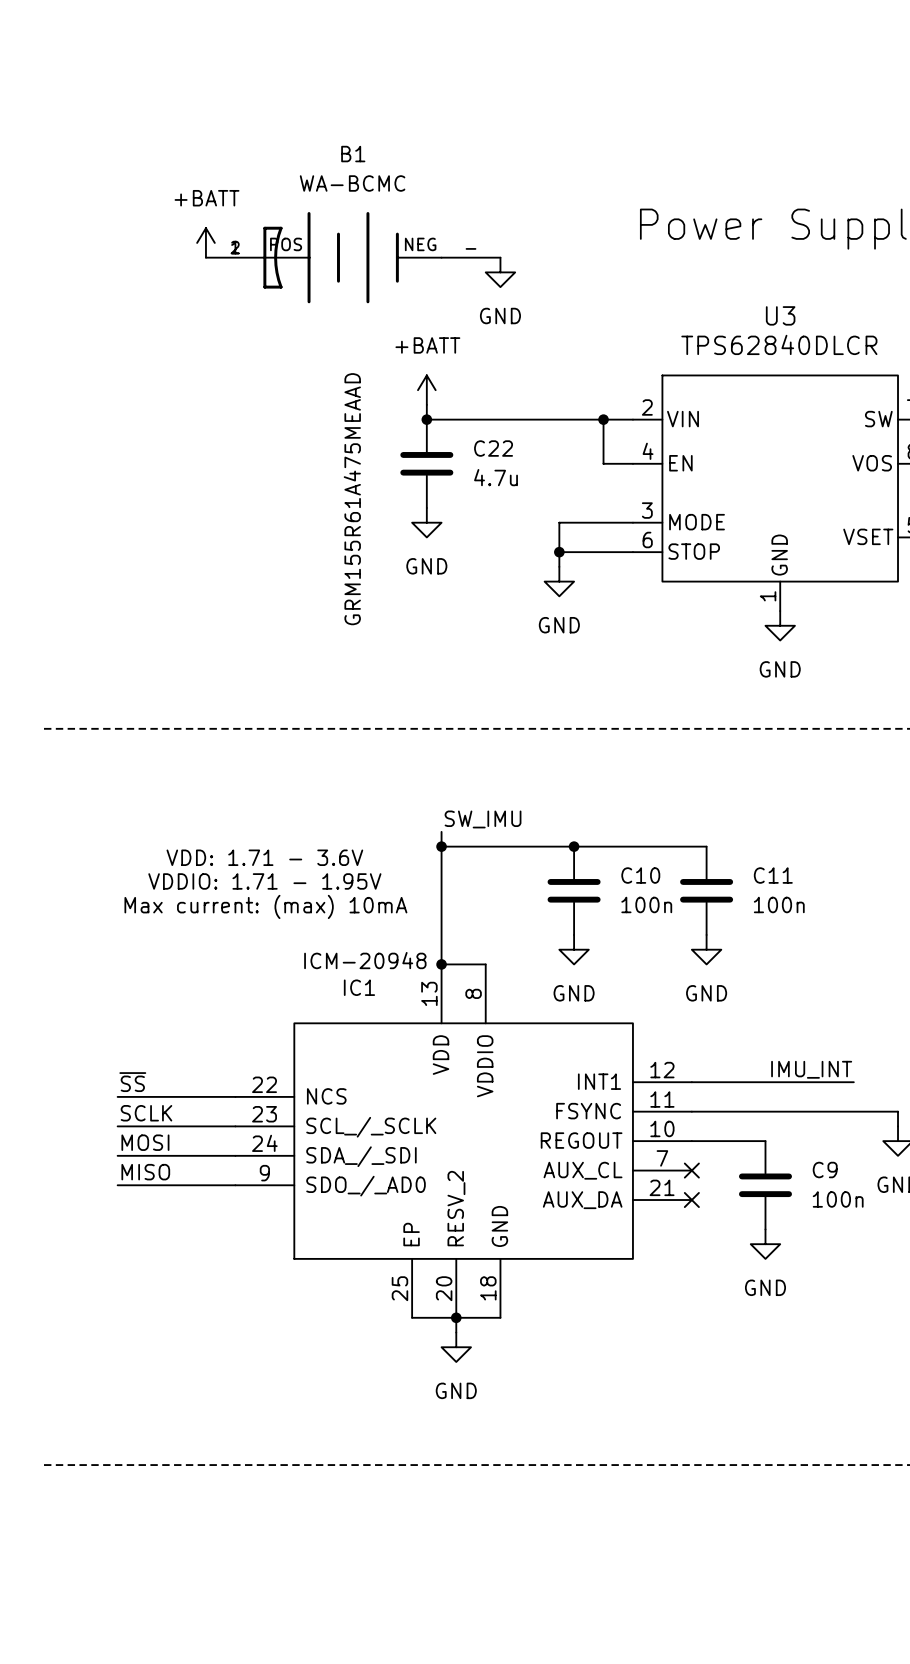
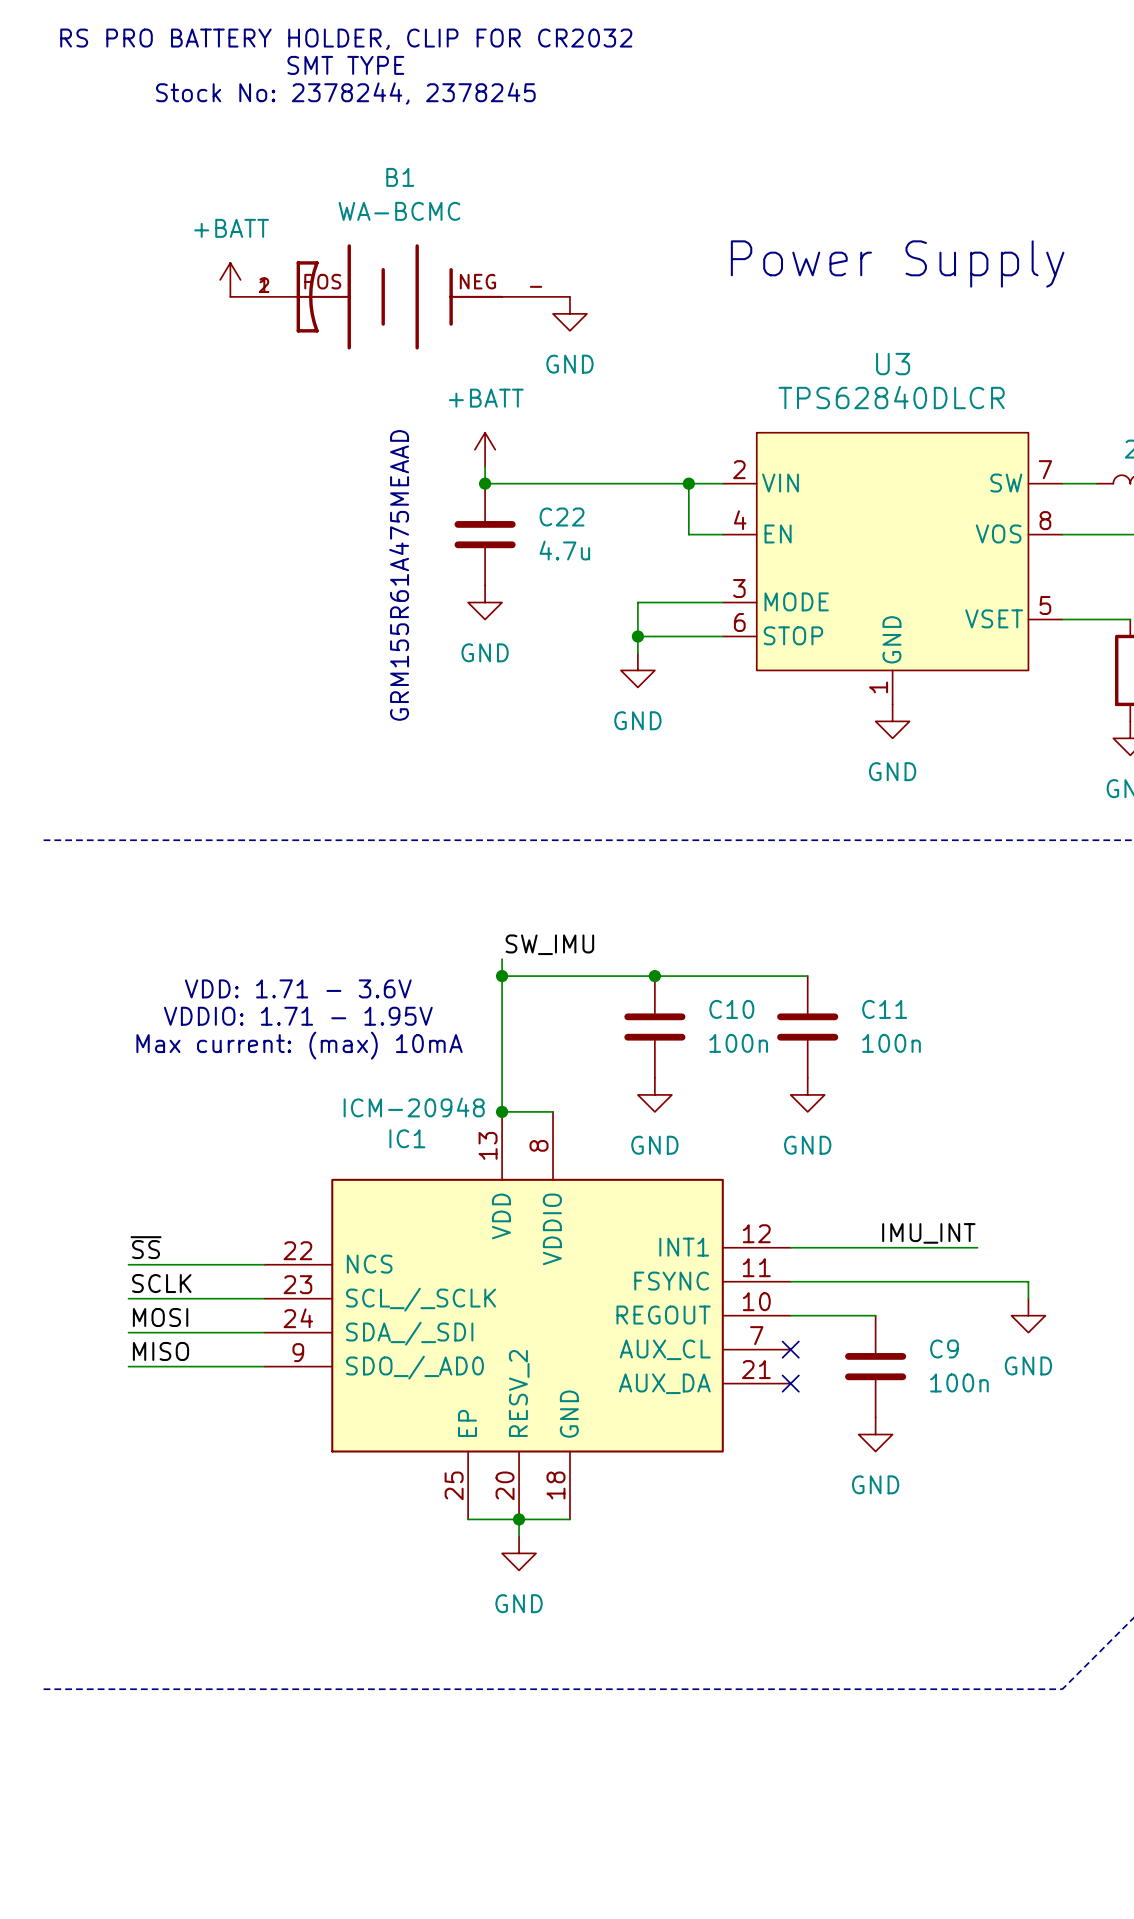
text: none -> RS PRO BATTERY HOLDER, CLIP FOR CR2032 (346, 39)
text: none -> SMT TYPE (345, 65)
text: none -> Stock No: 2378244, 2378245 (345, 93)

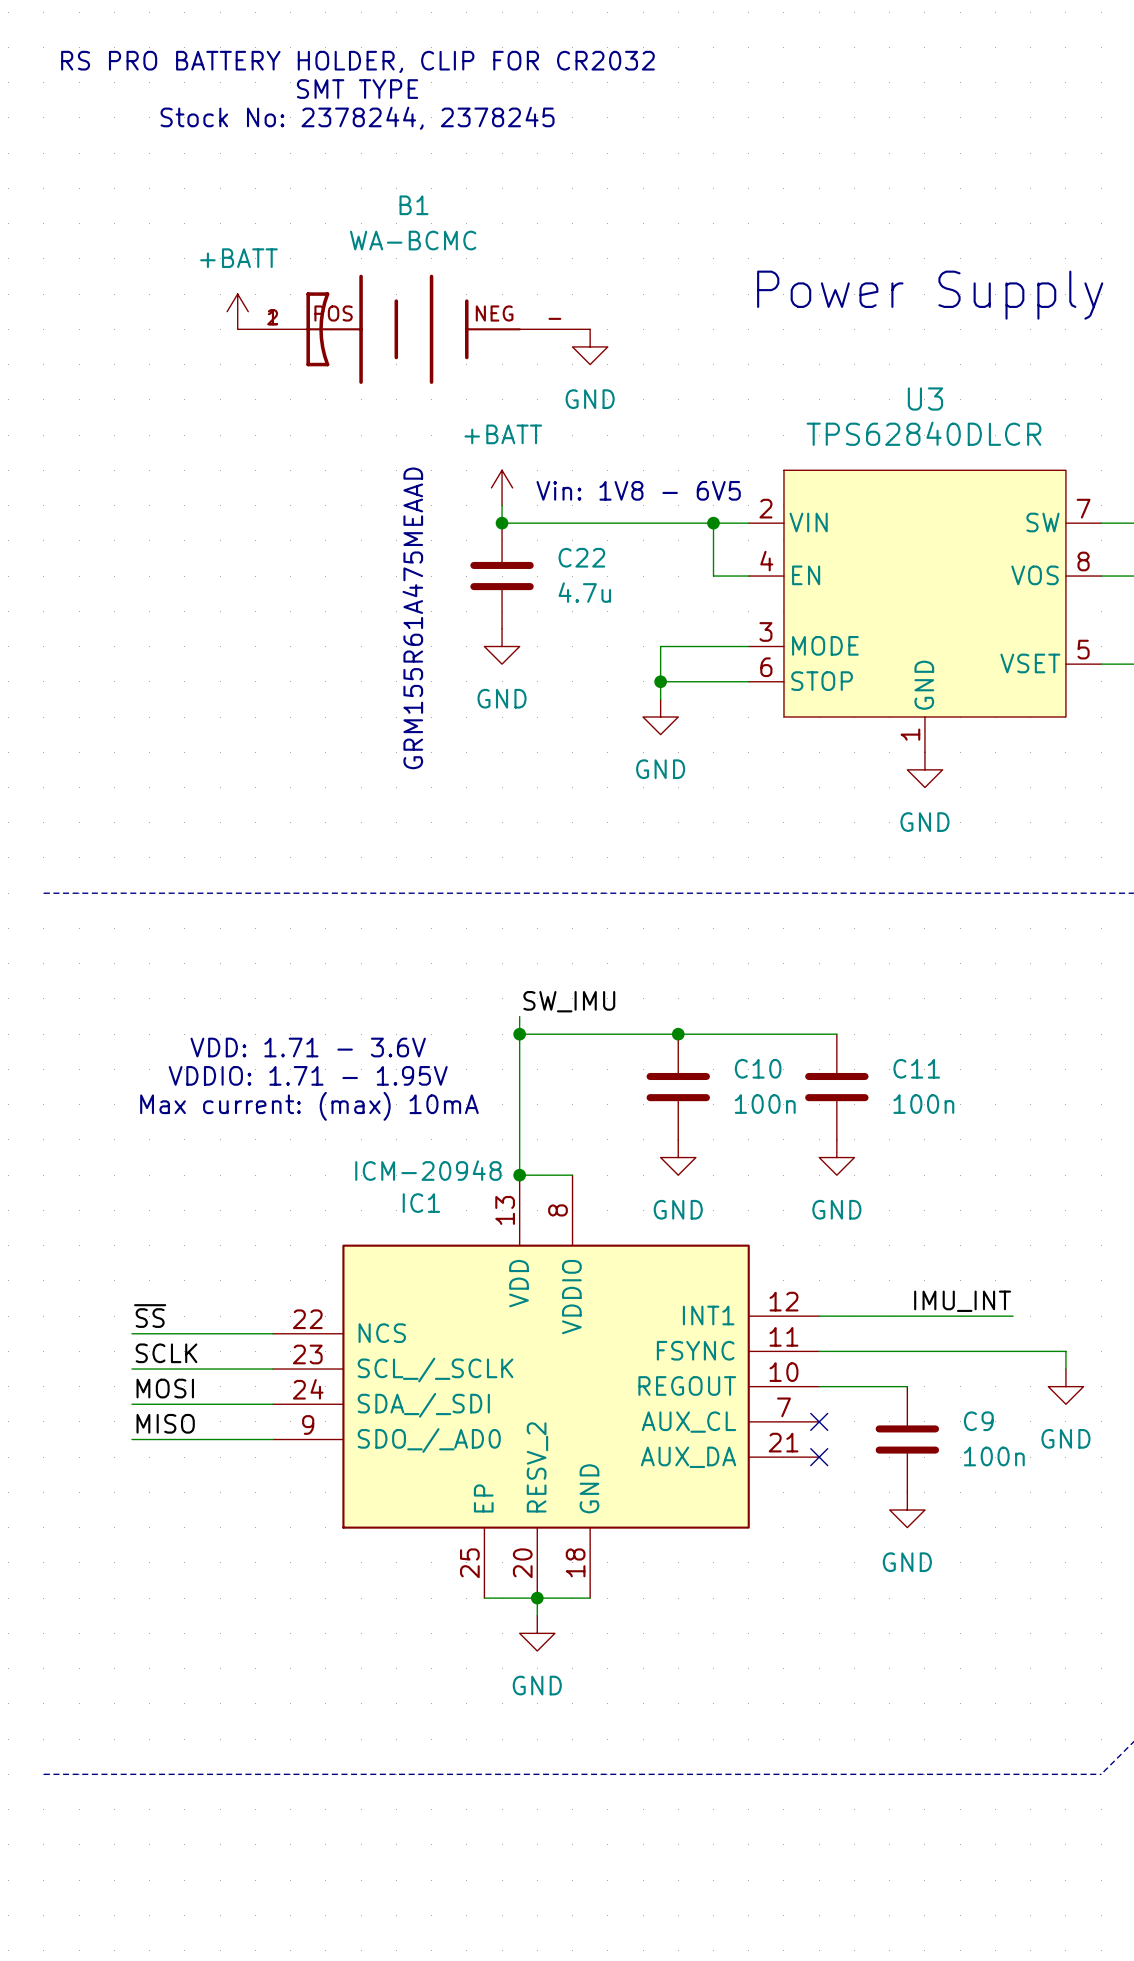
text: none -> Vin: 1V8 - 6V5 (638, 490)

